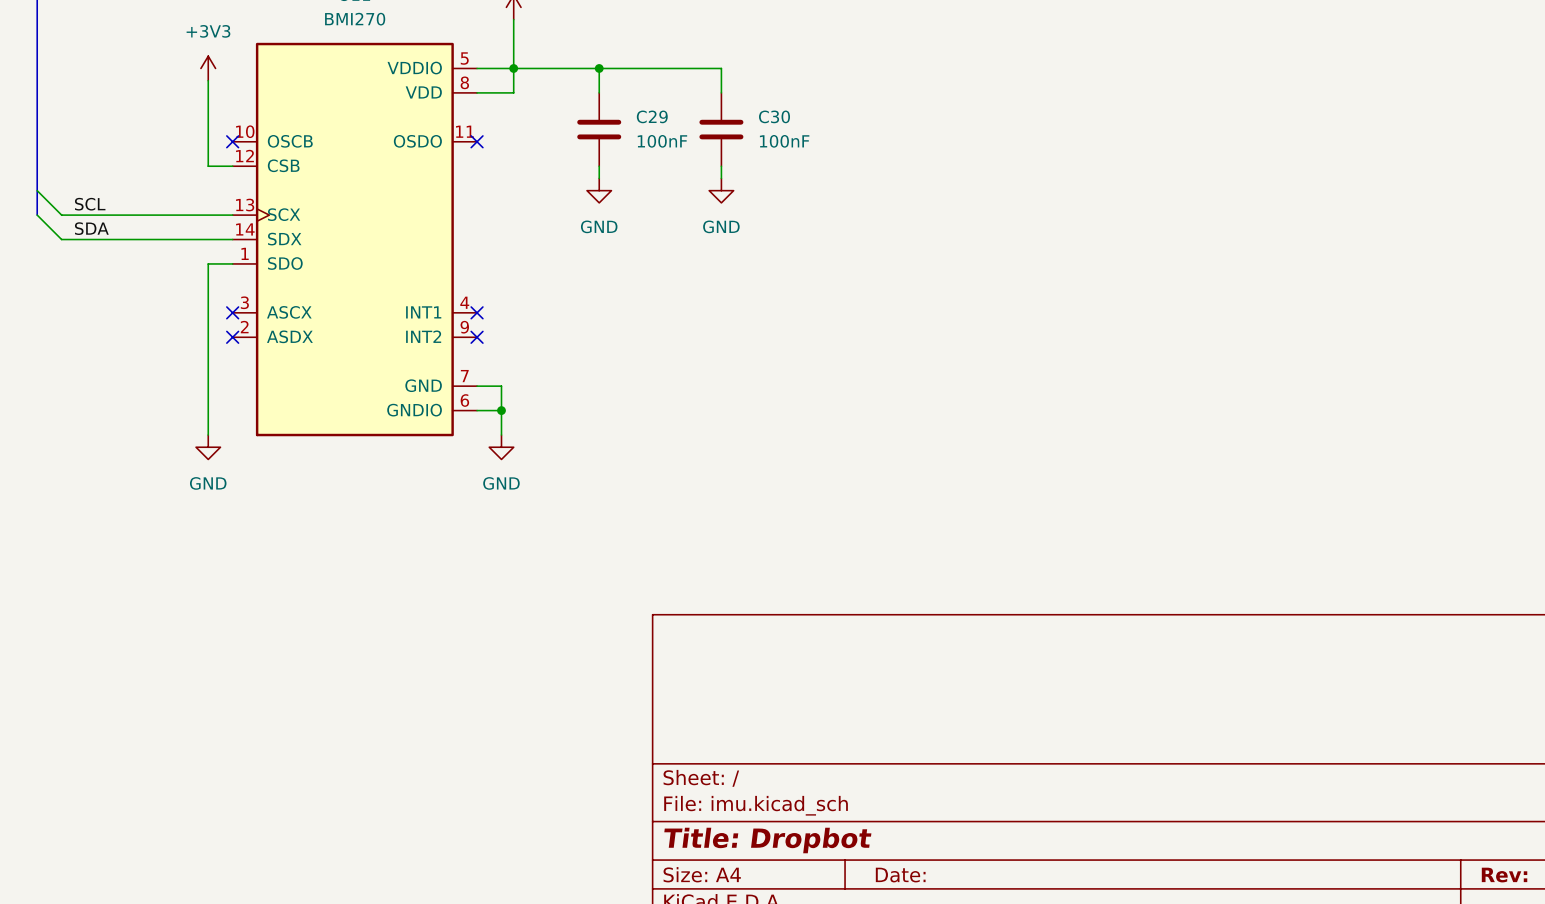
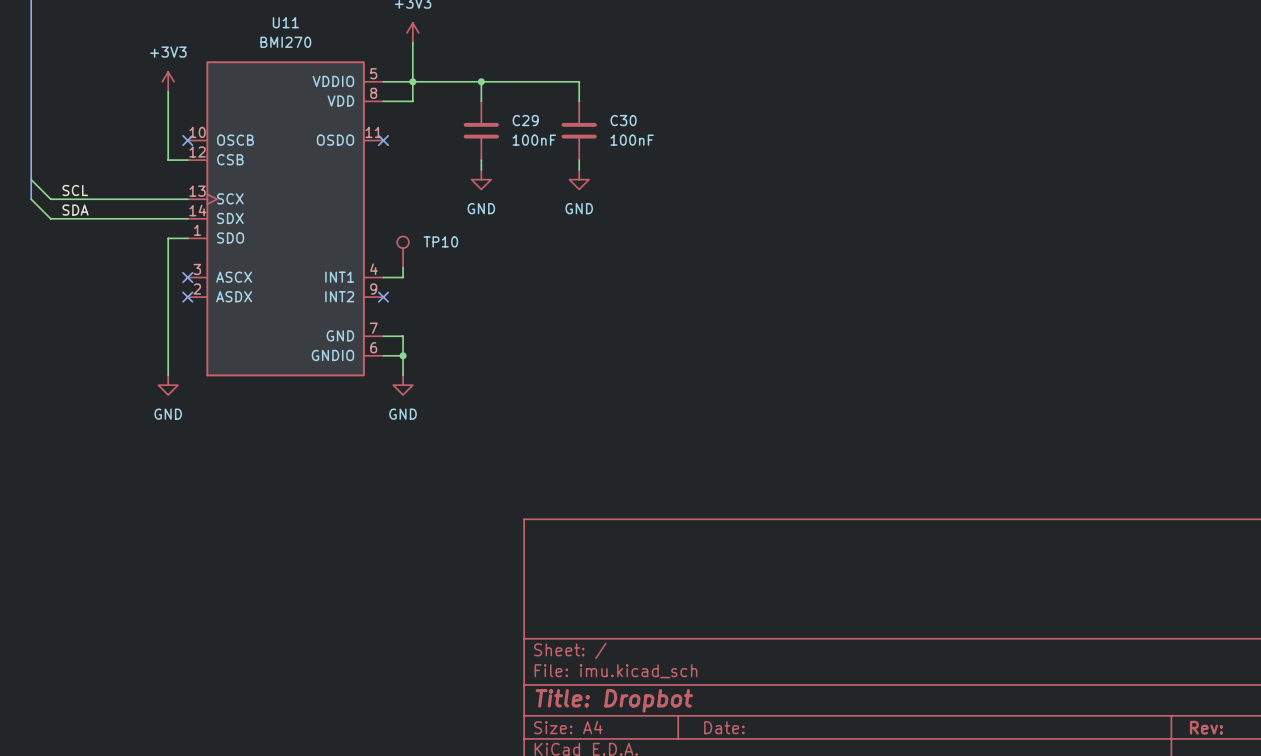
TP10: none -> (403, 252)
wire: none -> (403, 267) (403, 277) (383, 277)
no-connect mark: (477, 312) -> none

